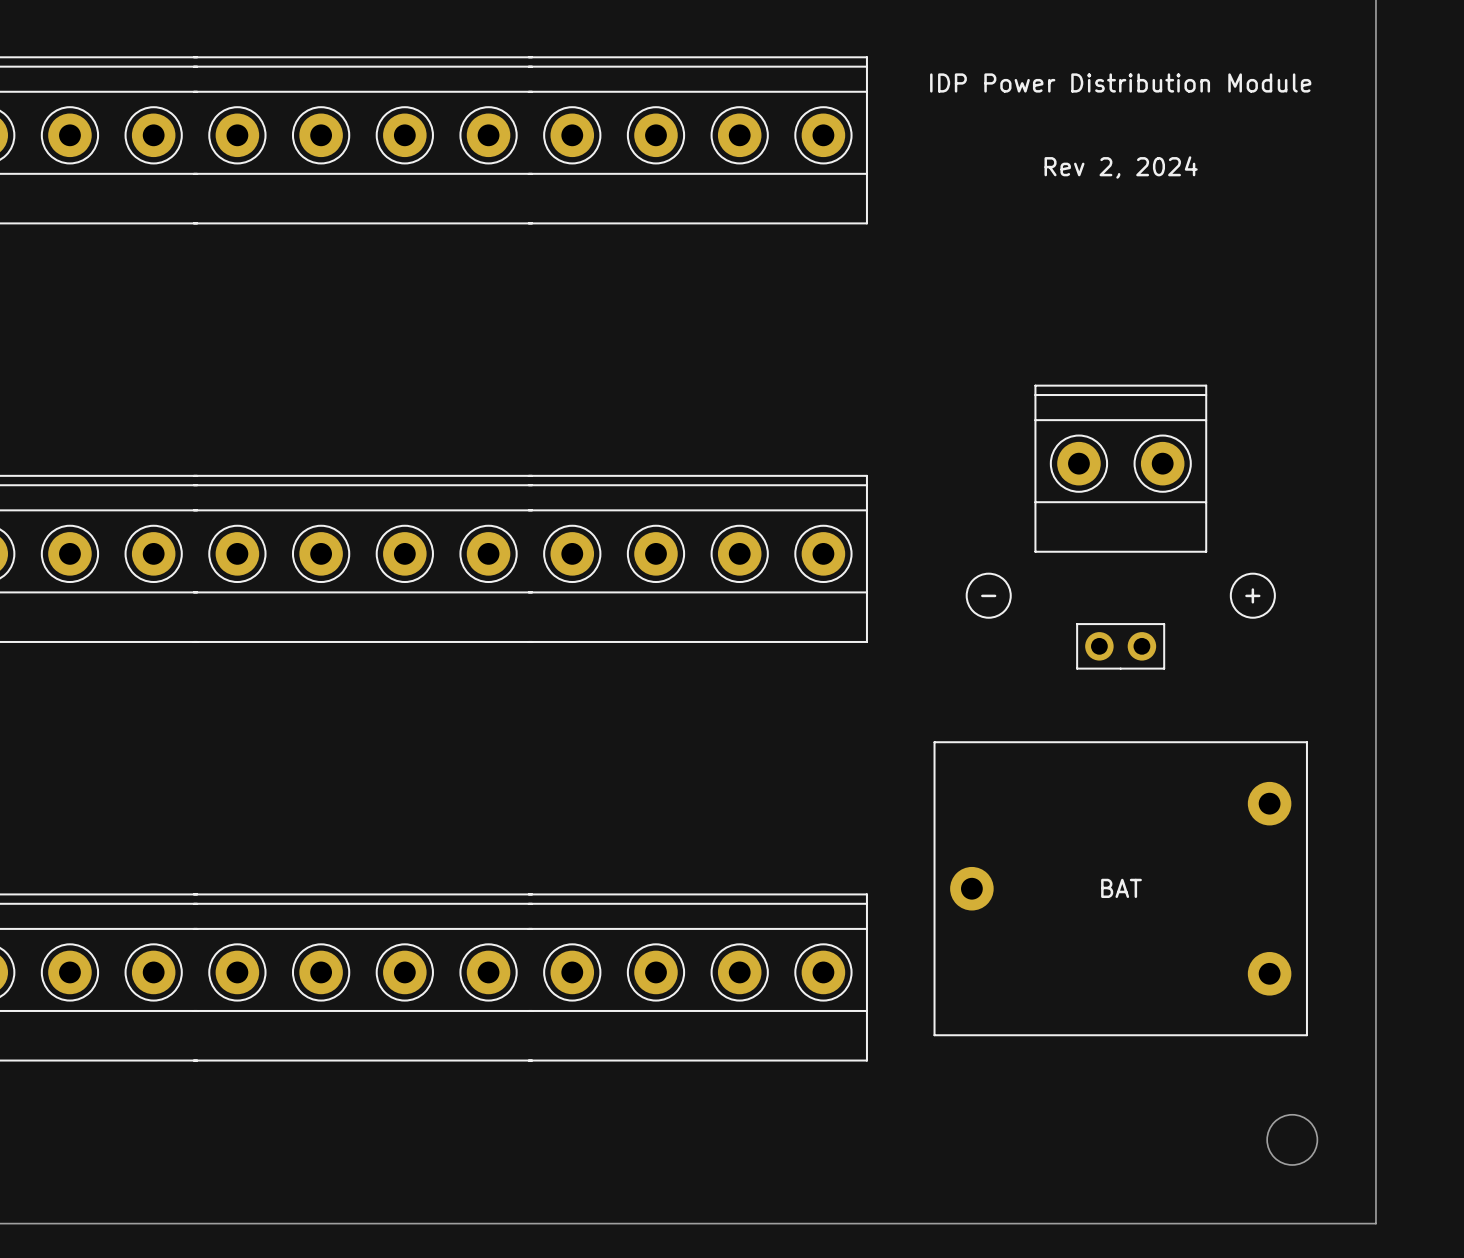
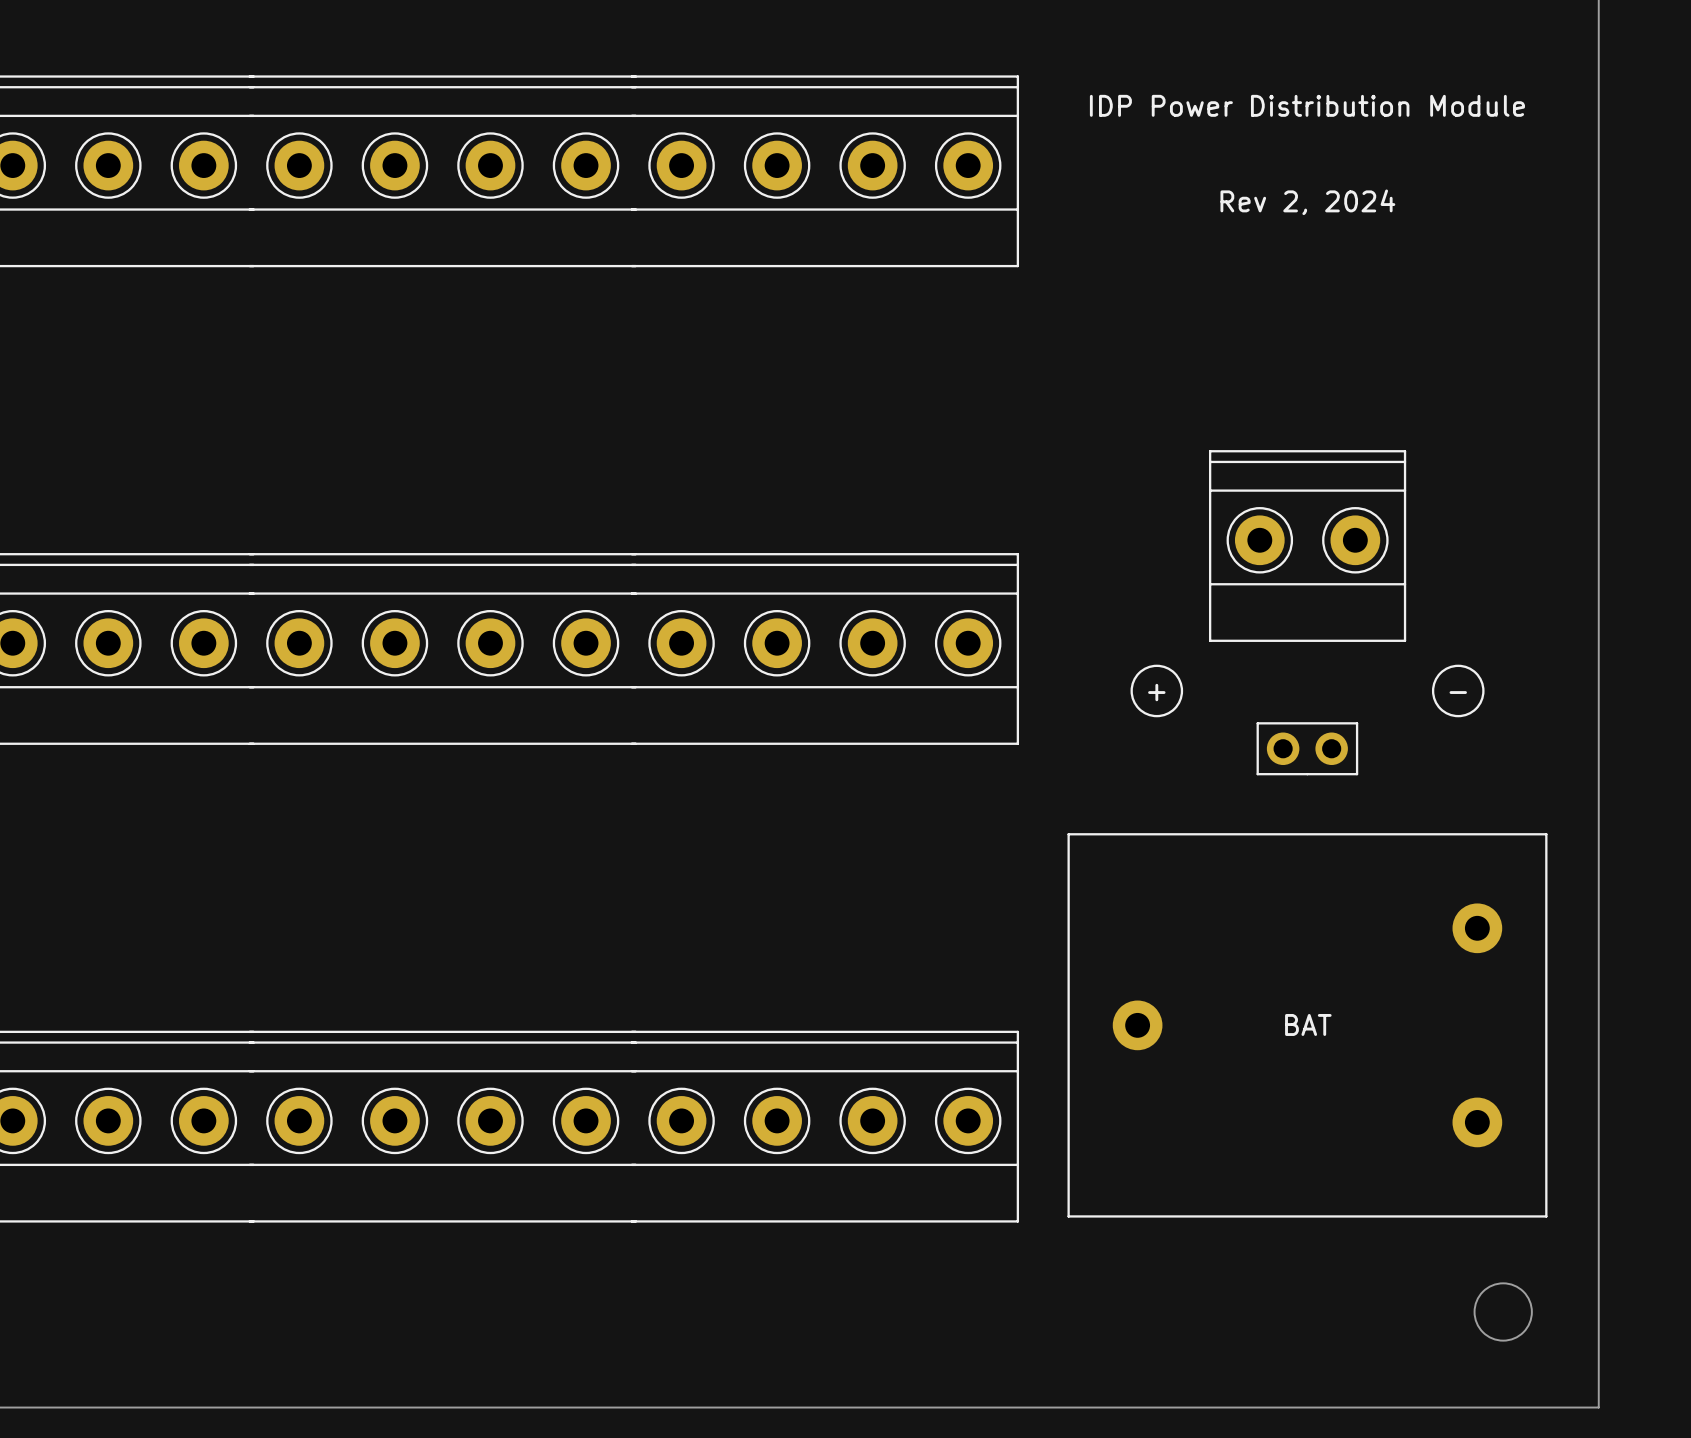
text: - (988, 595) -> + (1156, 692)
text: + (1252, 595) -> - (1458, 692)
line: (934, 742) (1306, 742) (1306, 1035) (934, 1035) (934, 742) -> (1068, 834) (1068, 1216) (1546, 1216) (1546, 834) (1068, 834)

